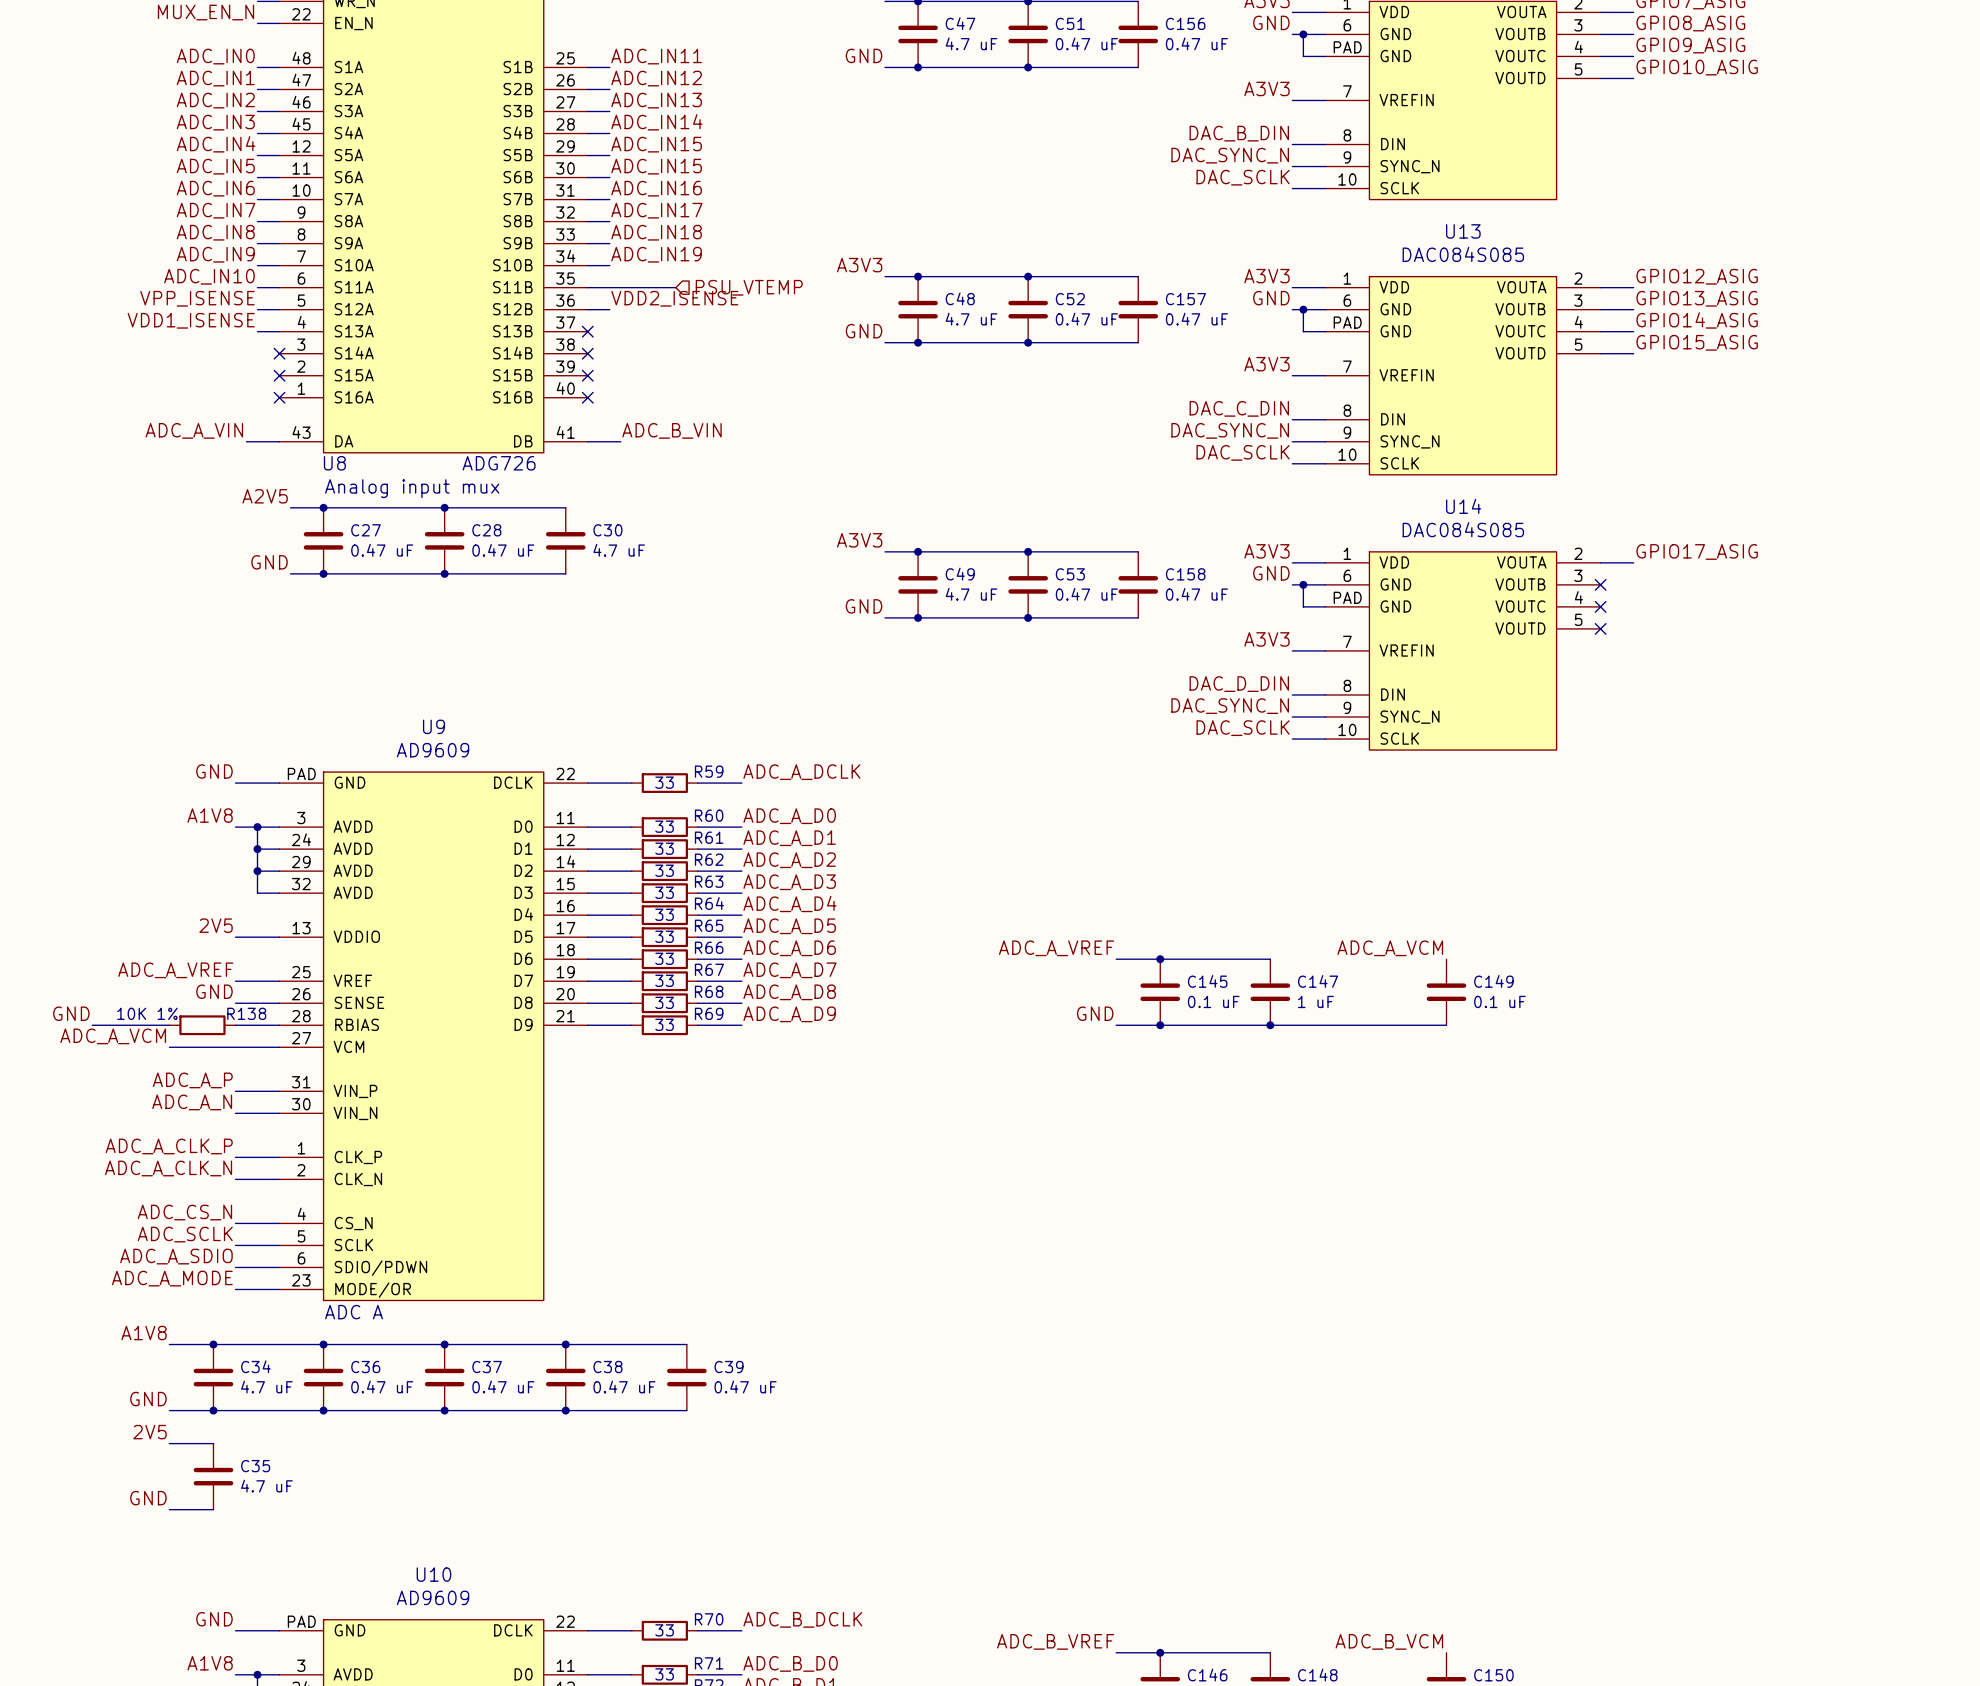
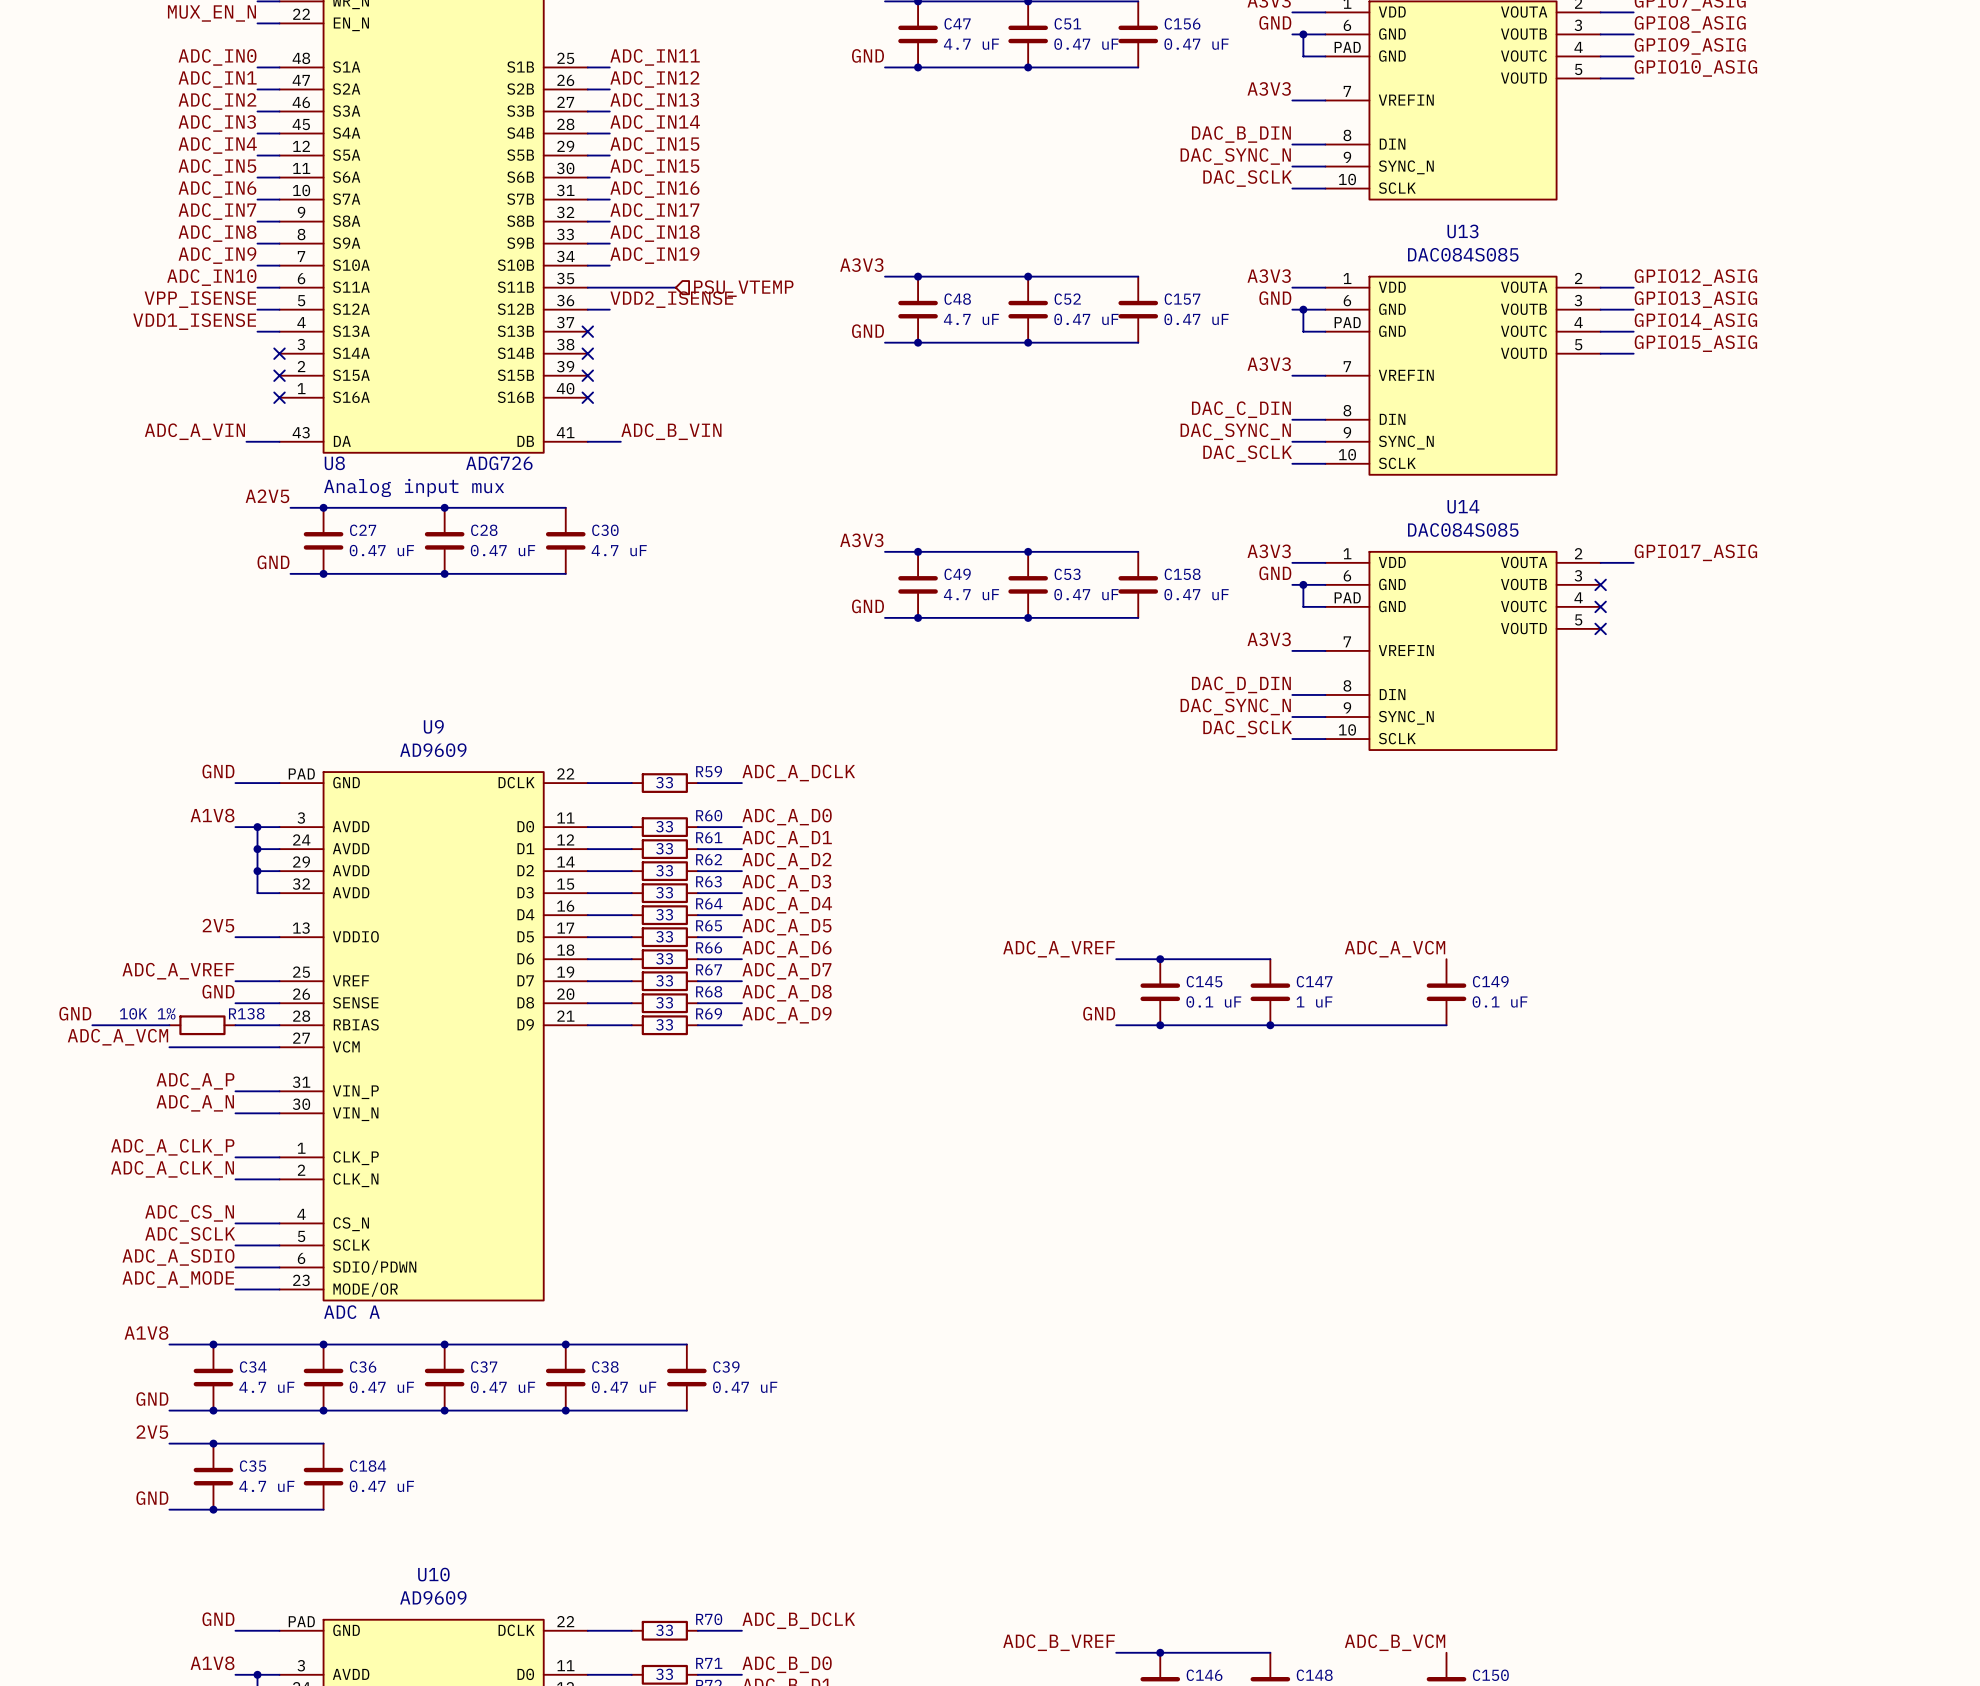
wire: none -> (213, 1443) (323, 1443)
junction: none -> (213, 1443)
C184: none -> 0.47 uF (323, 1476)
wire: none -> (213, 1509) (323, 1509)
junction: none -> (213, 1509)

